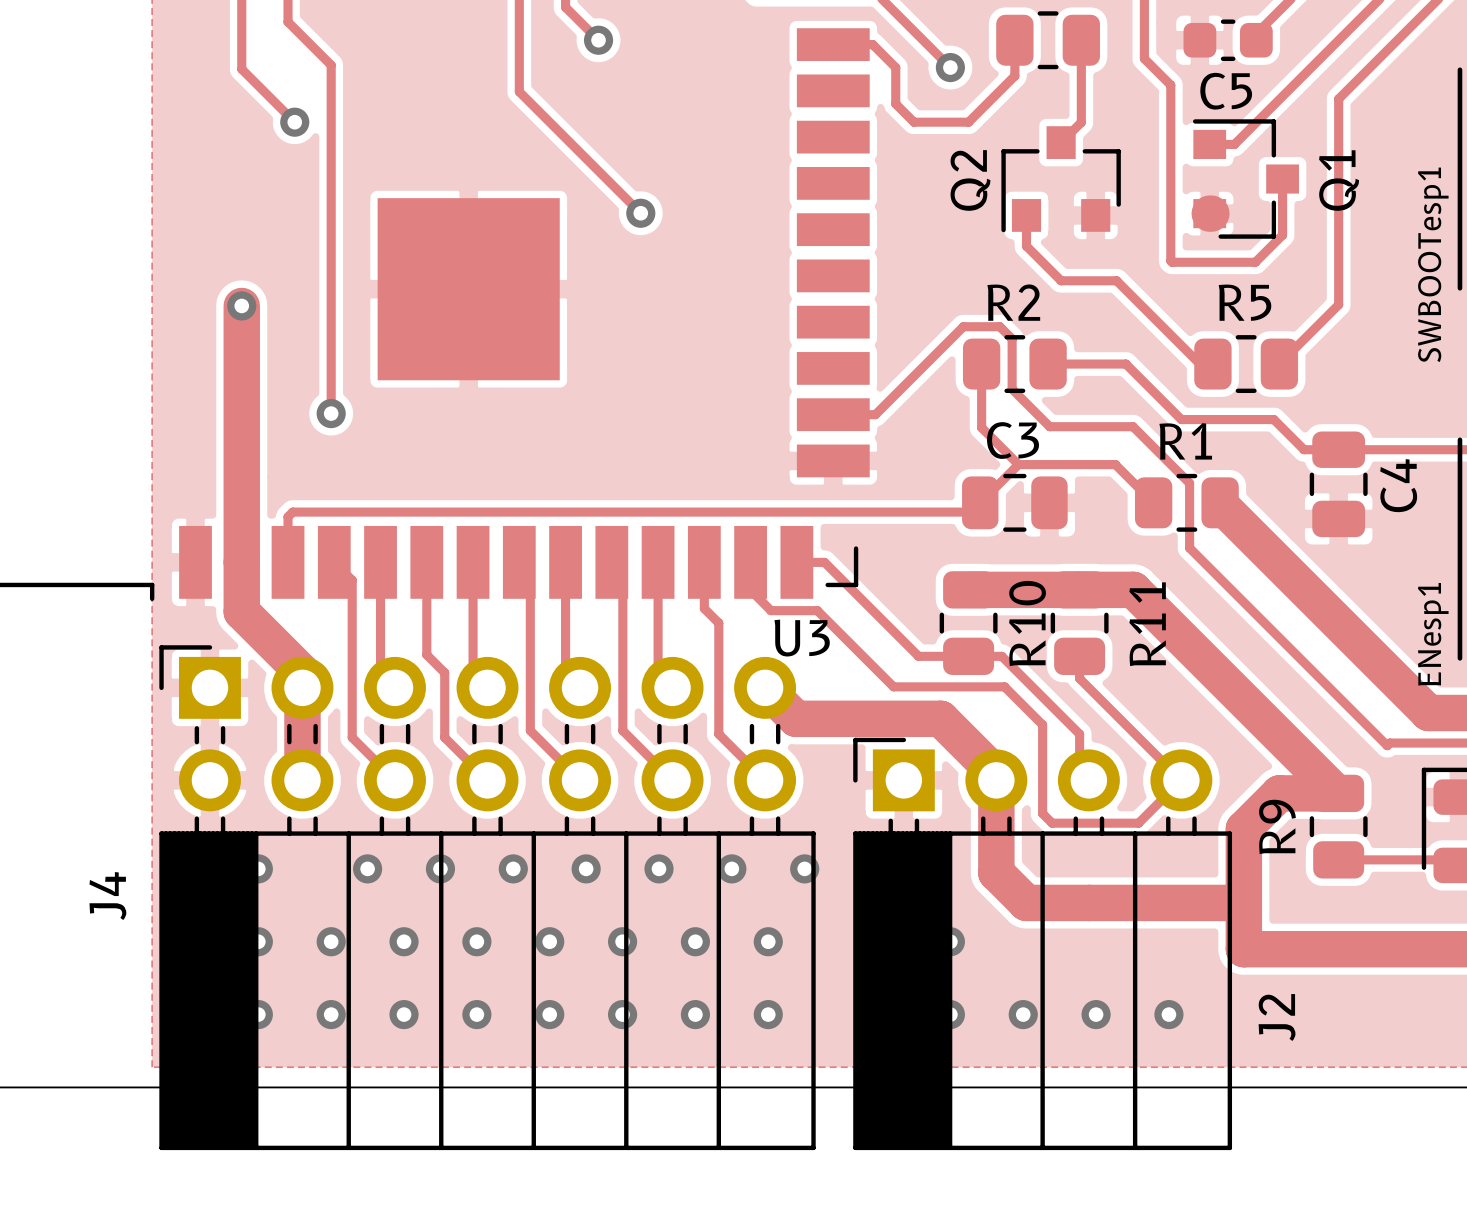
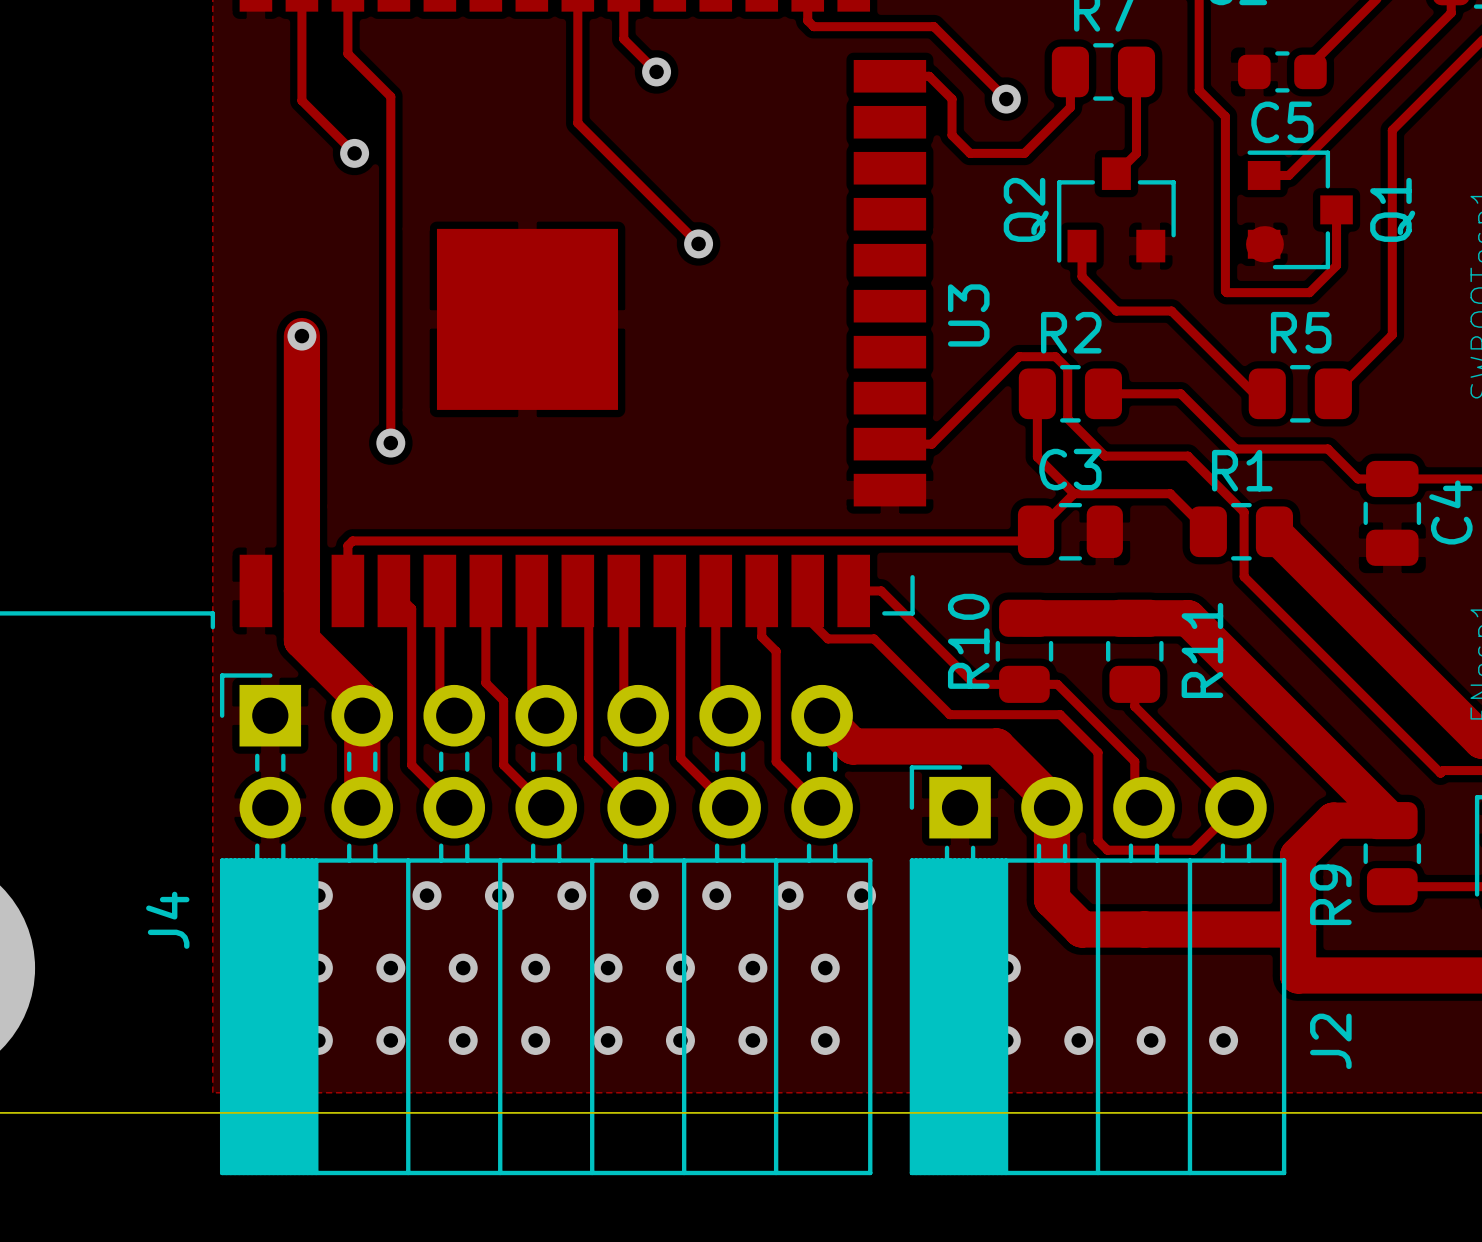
R10 name position: R10 (1027, 623) -> R10 (968, 641)
U3 name rotation: 0° (802, 638) -> 90° counterclockwise (968, 315)
U3 name position: U3 (802, 638) -> U3 (968, 315)
R9 name position: R9 (1277, 826) -> R9 (1330, 894)

